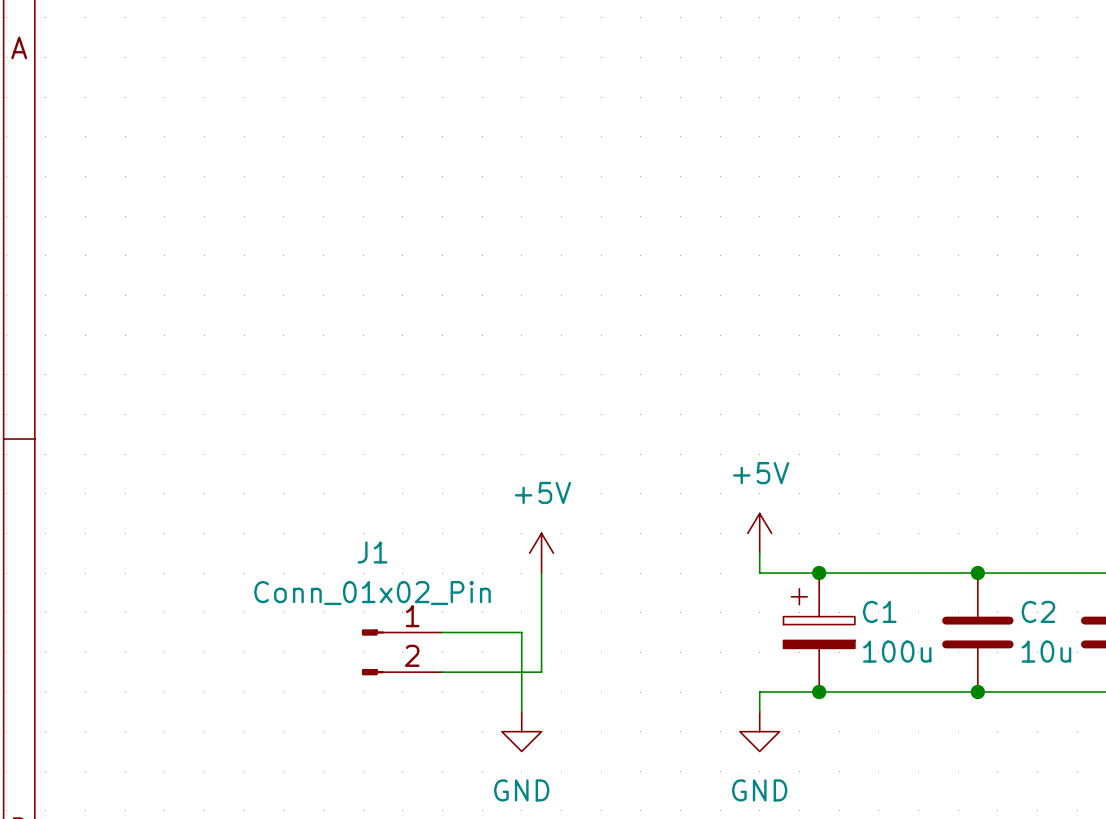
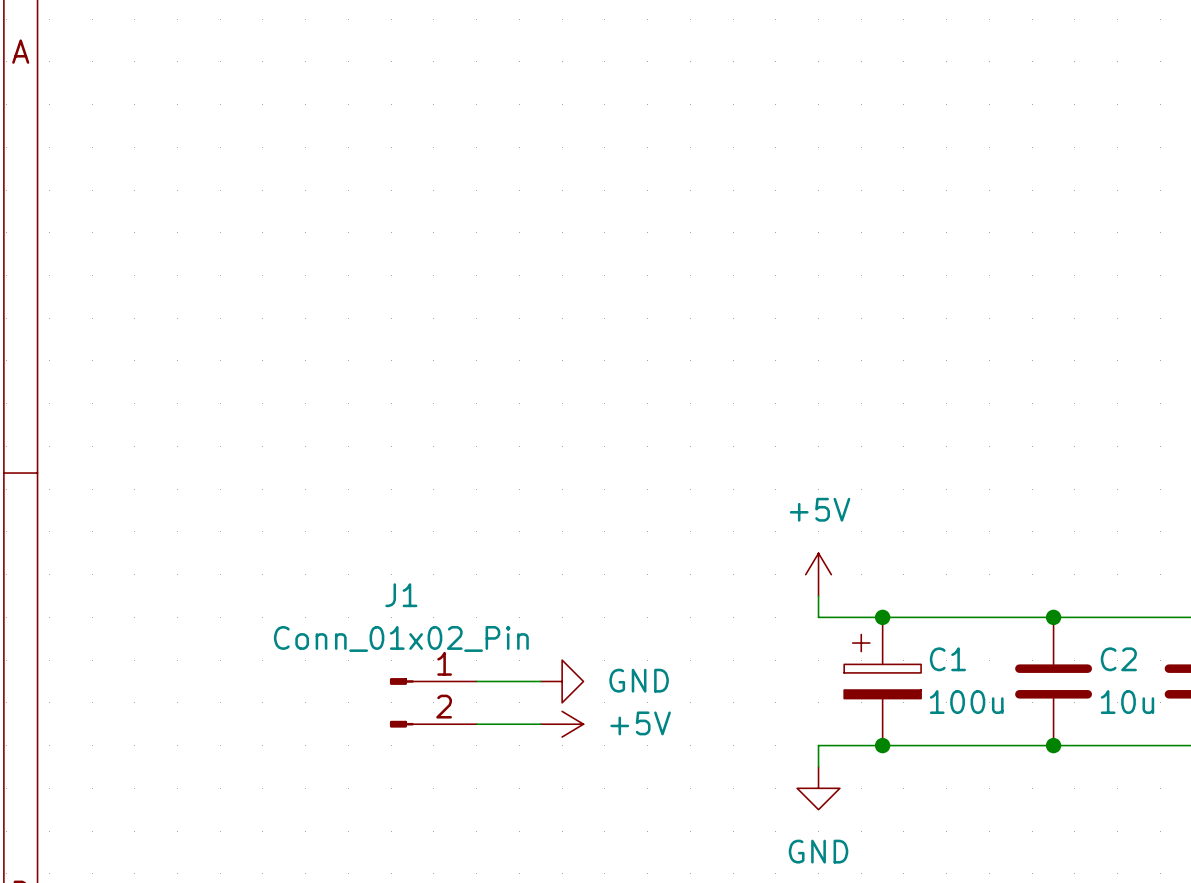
power symbol rotation: 0° (541, 553) -> 90° clockwise (562, 724)
power symbol position: +5V (541, 553) -> +5V (562, 724)
wire: (541, 573) (541, 672) (501, 672) -> none
wire: (501, 632) (521, 632) (521, 711) -> none
power symbol rotation: 0° (521, 731) -> 90° counterclockwise (562, 681)
power symbol position: GND (521, 731) -> GND (562, 681)

